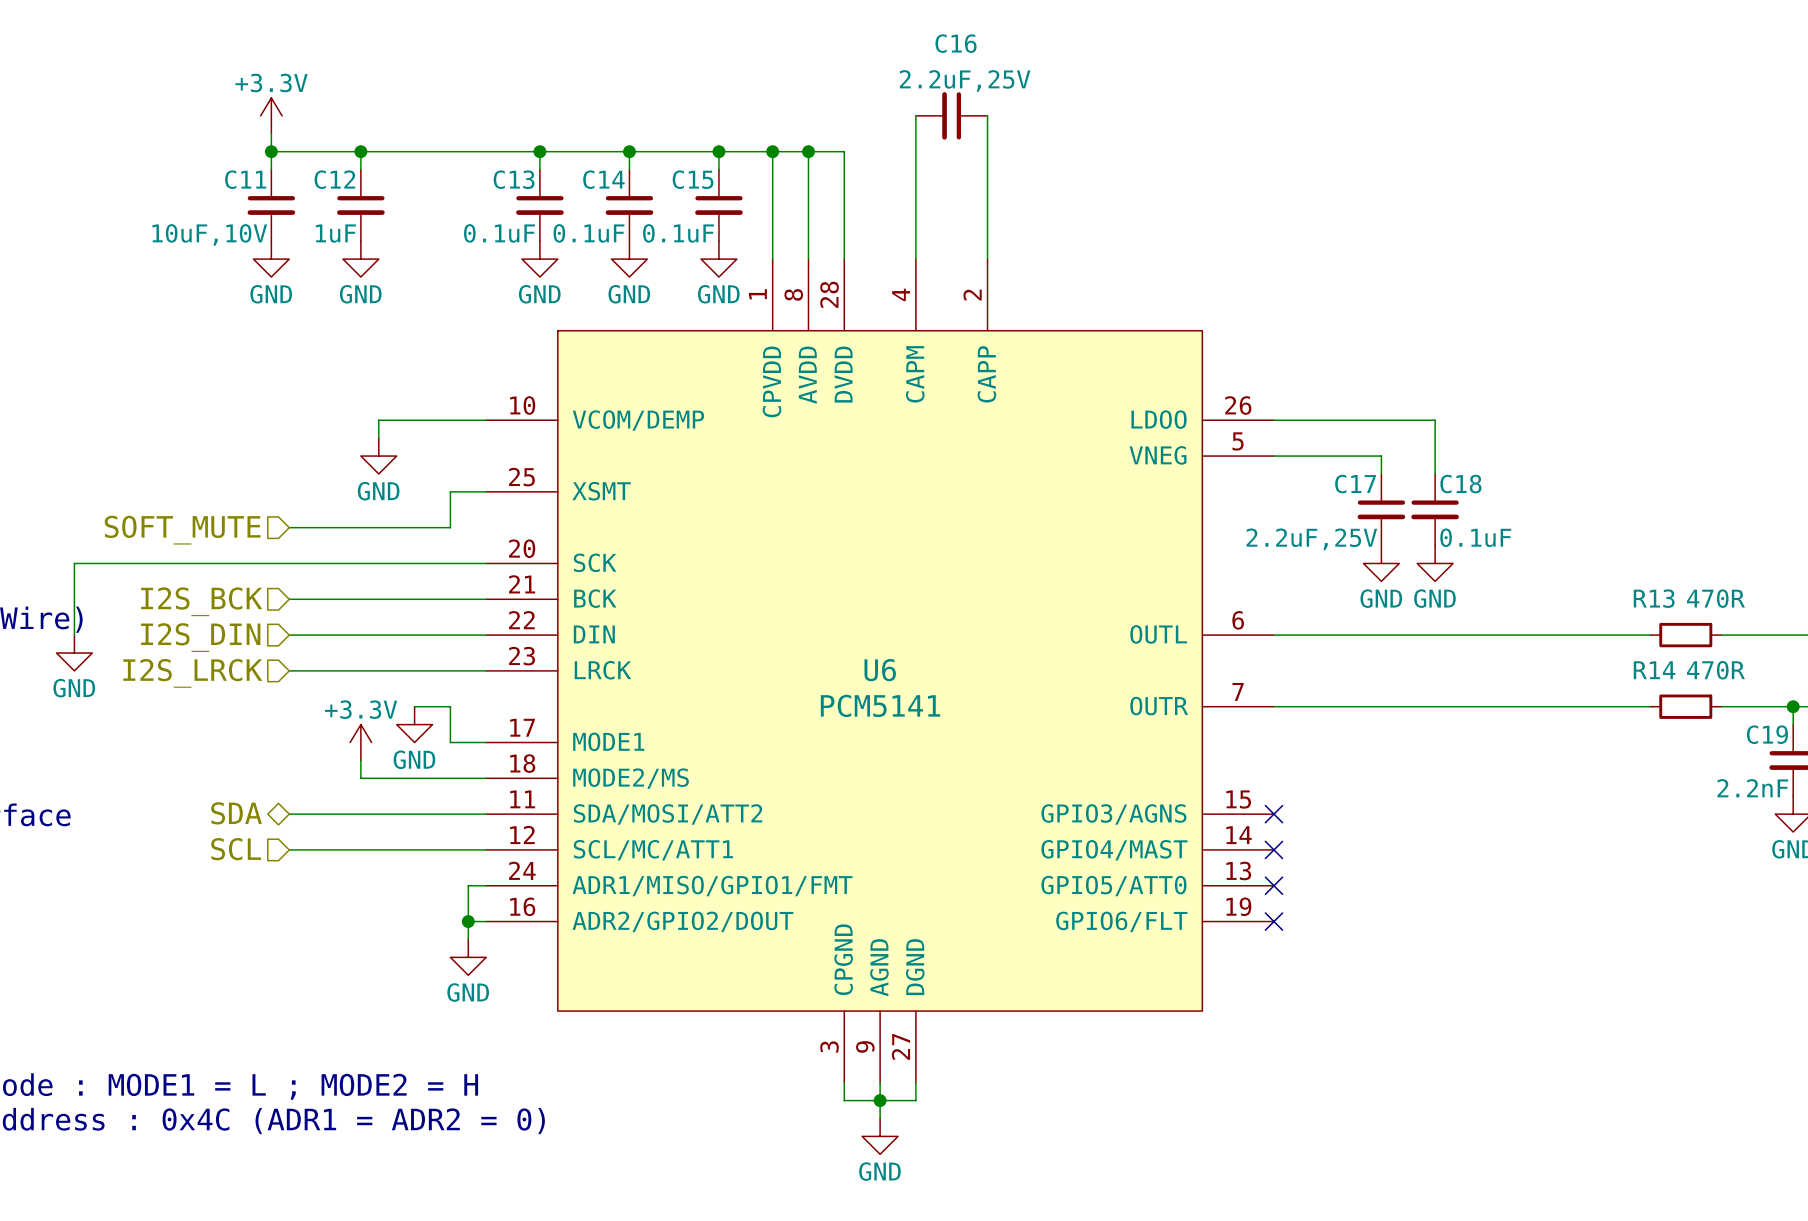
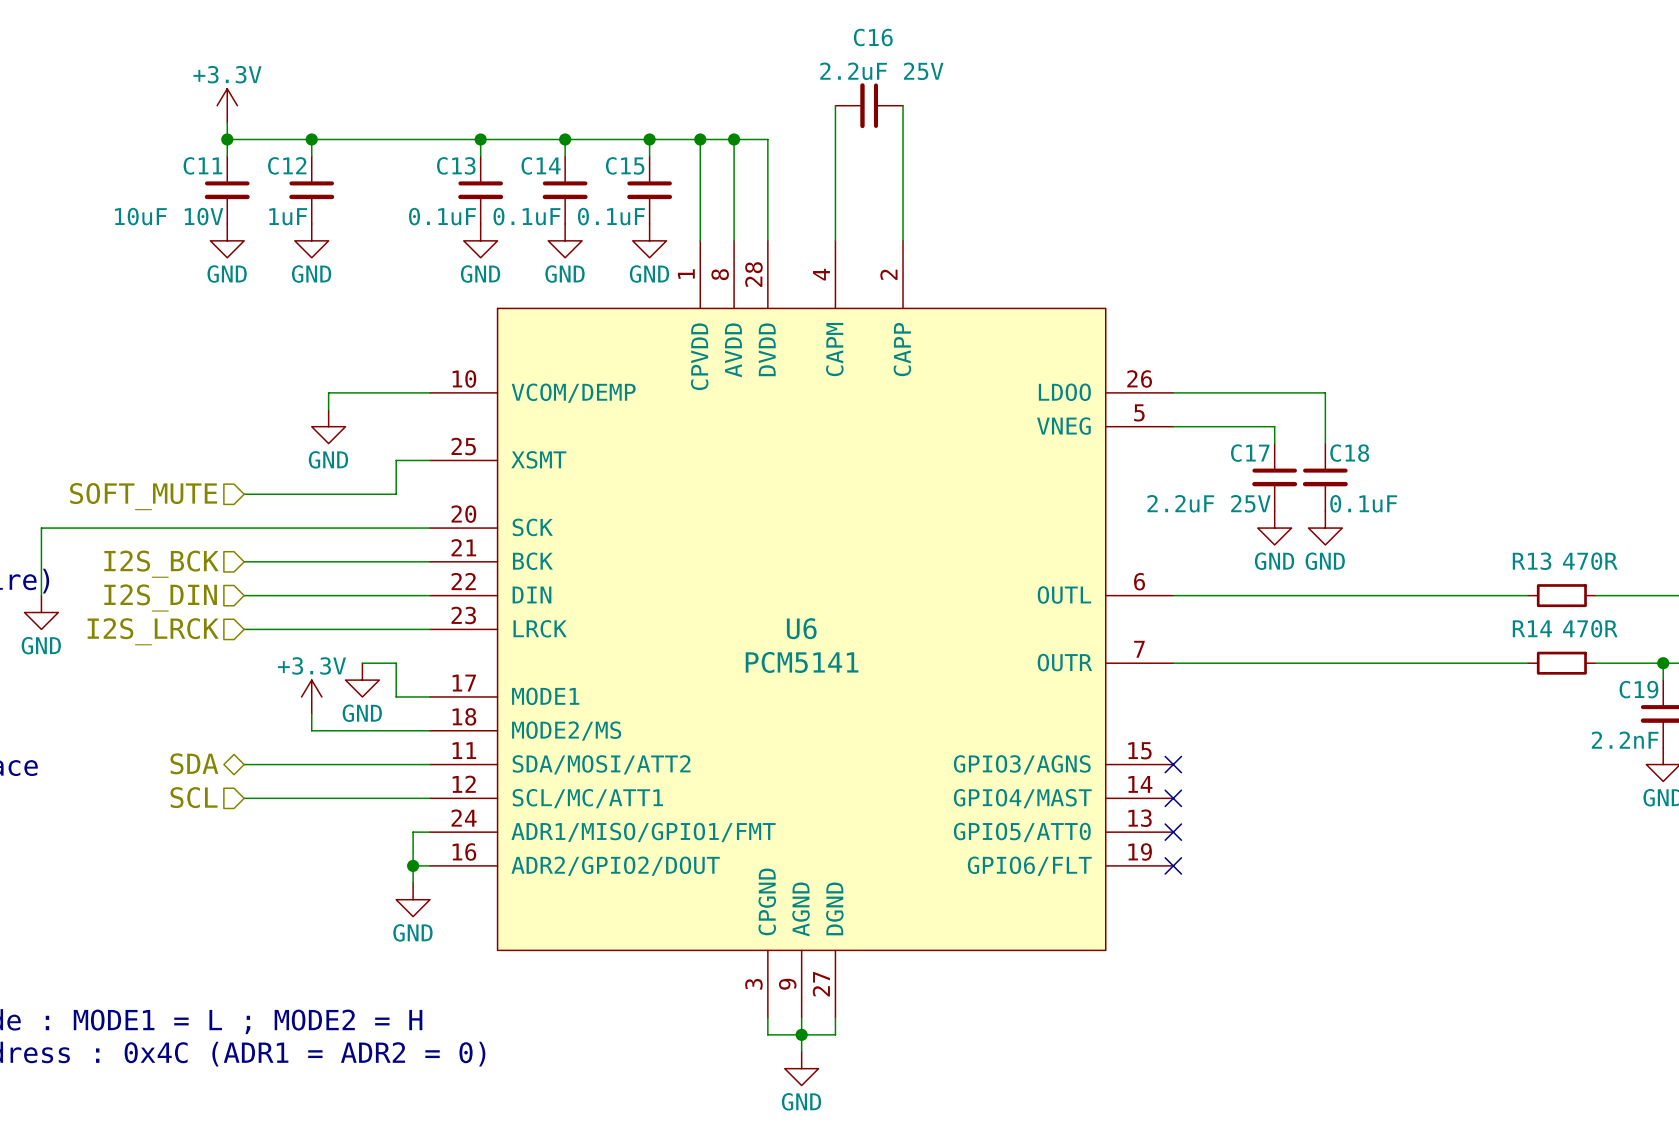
C16 value: 2.2uF,25V (965, 80) -> 2.2uF 25V (881, 71)
C11 value: 10uF,10V (209, 234) -> 10uF 10V (169, 216)
C17 value: 2.2uF,25V (1311, 539) -> 2.2uF 25V (1209, 503)

